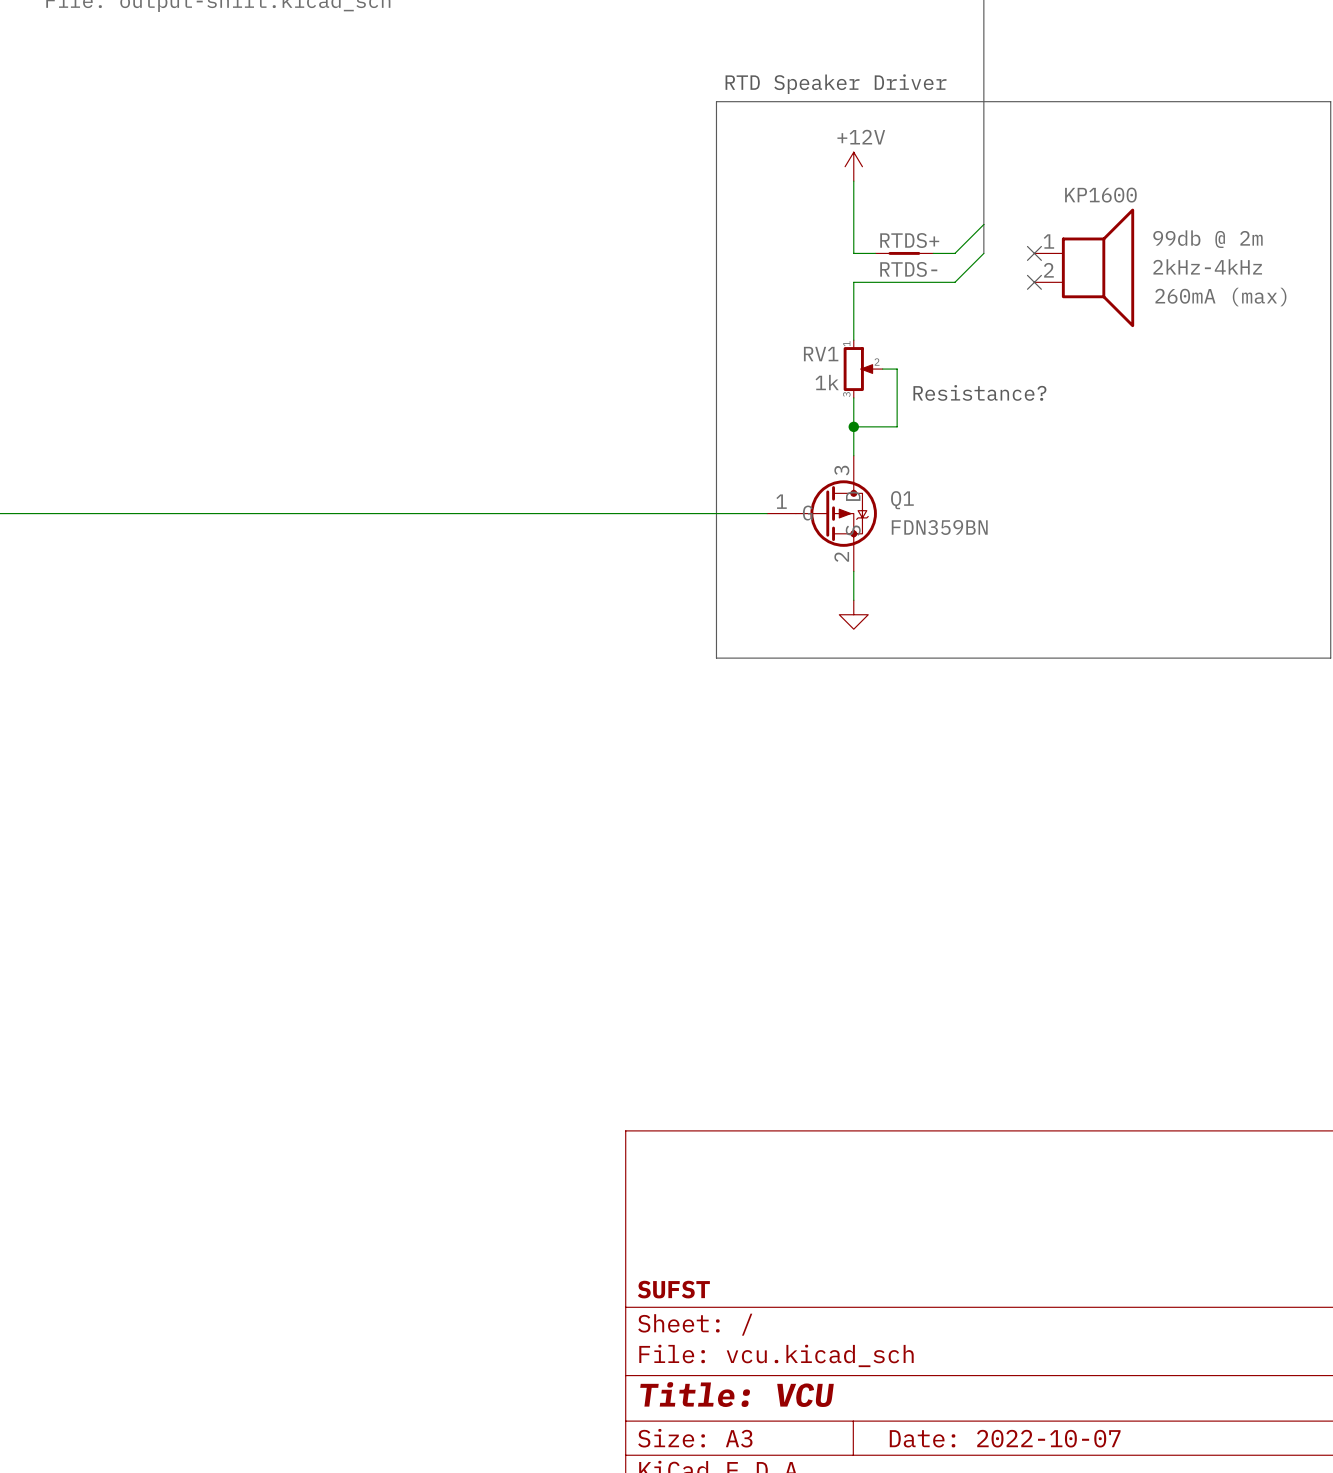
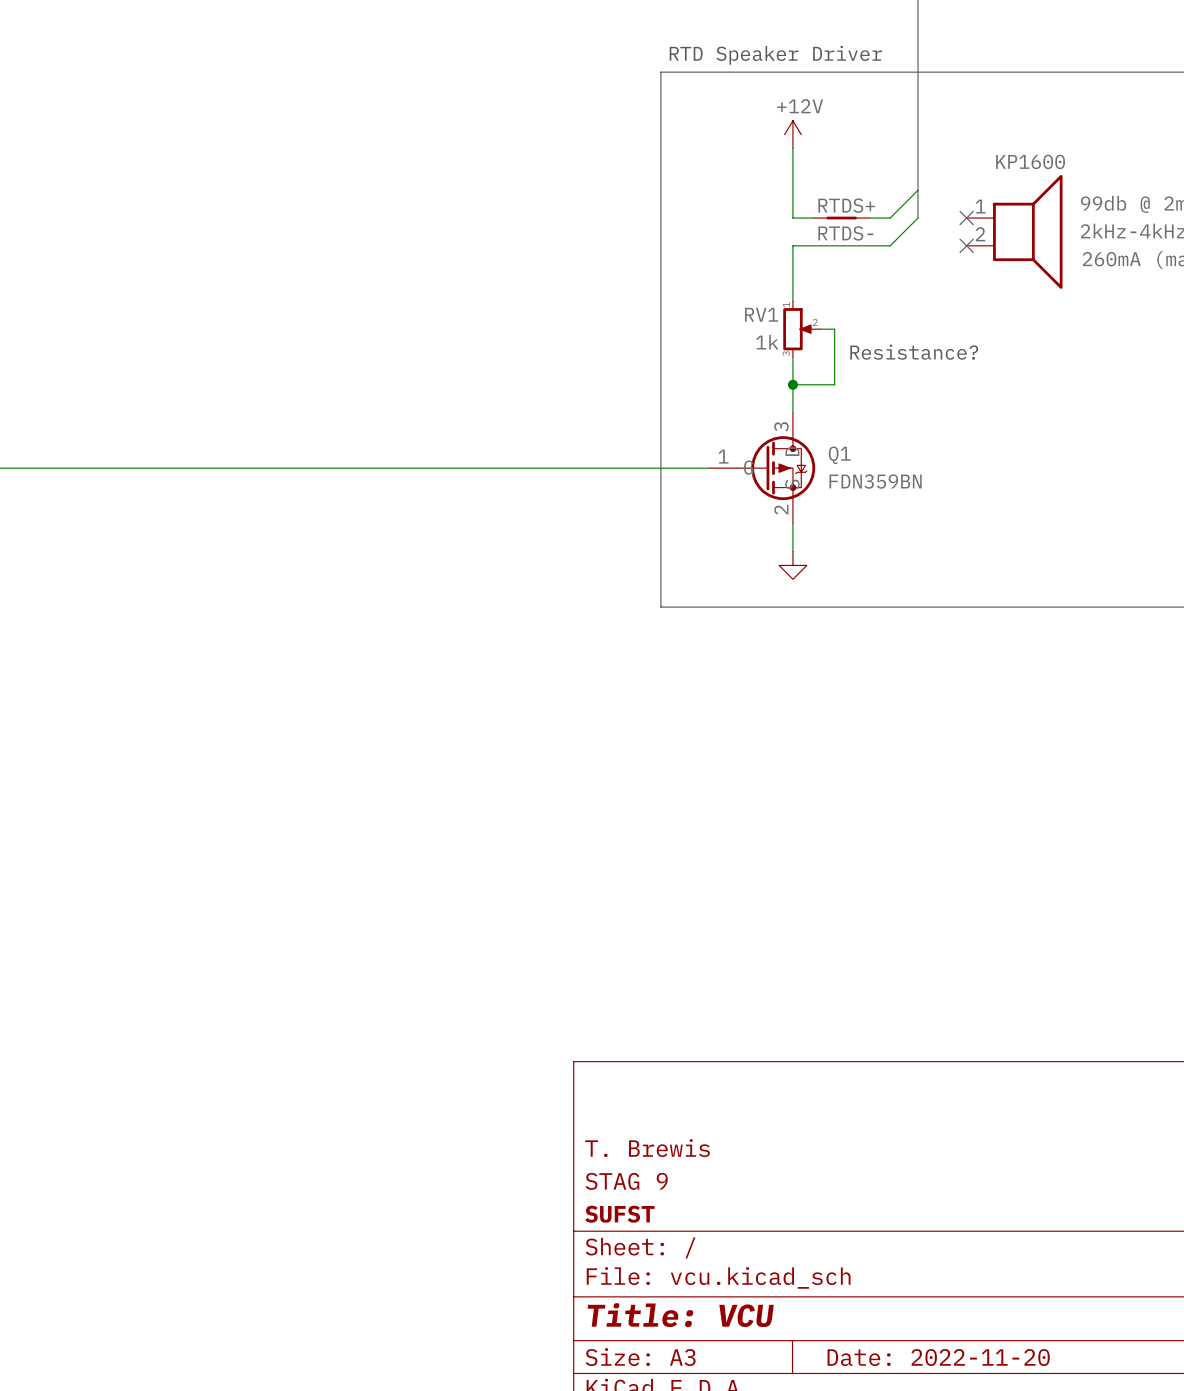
title block: none -> T. Brewis (647, 1148)
title block: none -> STAG 9 (626, 1181)
title block: Date: 2022-10-07 (1005, 1438) -> Date: 2022-11-20 (938, 1357)

